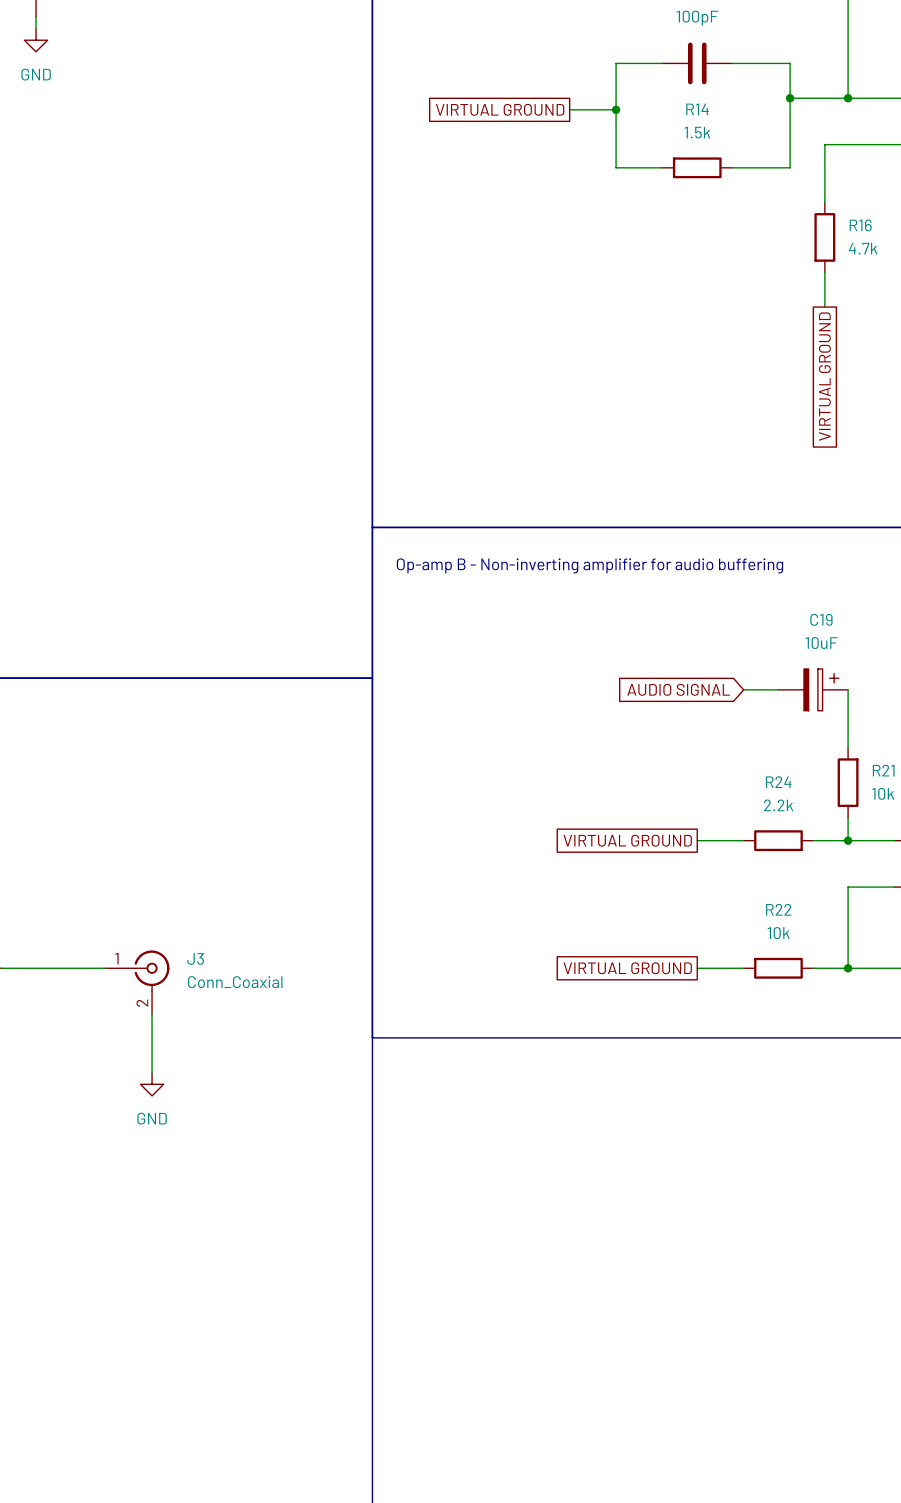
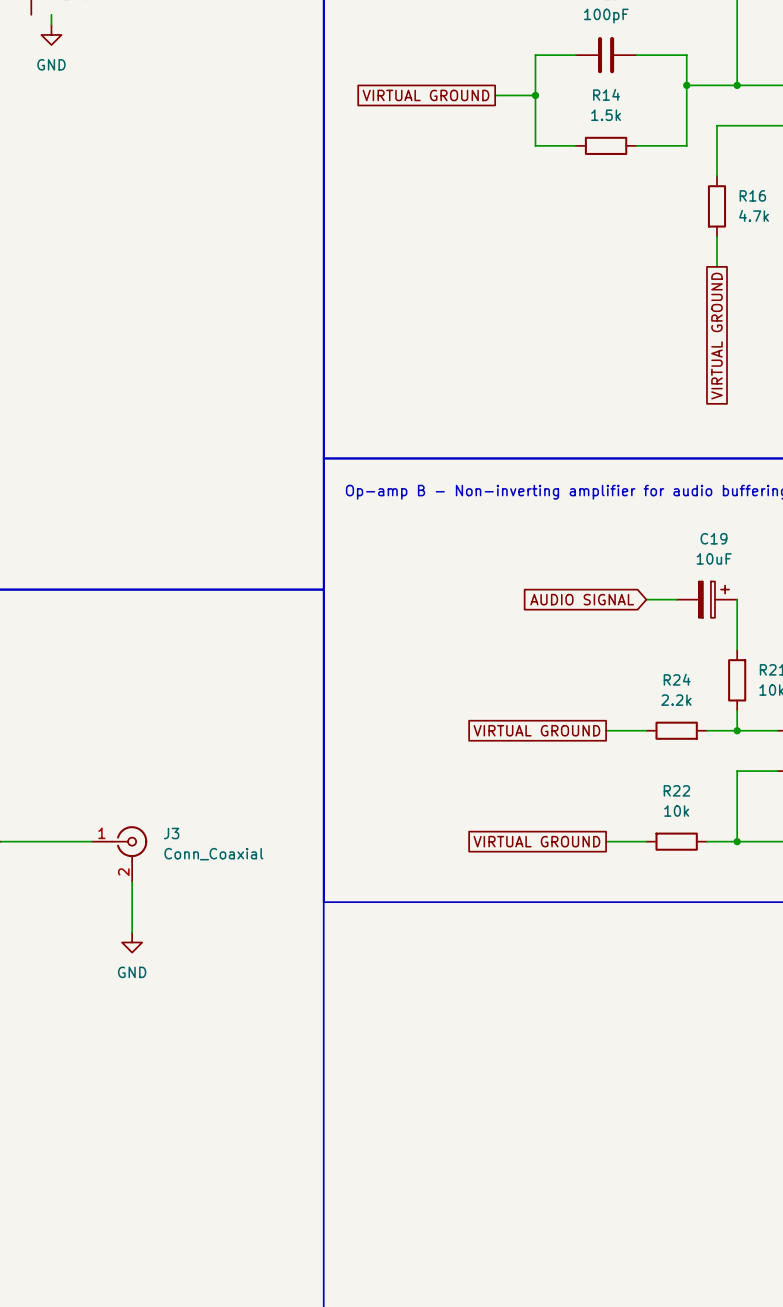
wire: (36, 17) (36, 28) -> (51, 14) (51, 24)
power symbol position: GND (36, 40) -> GND (51, 34)

